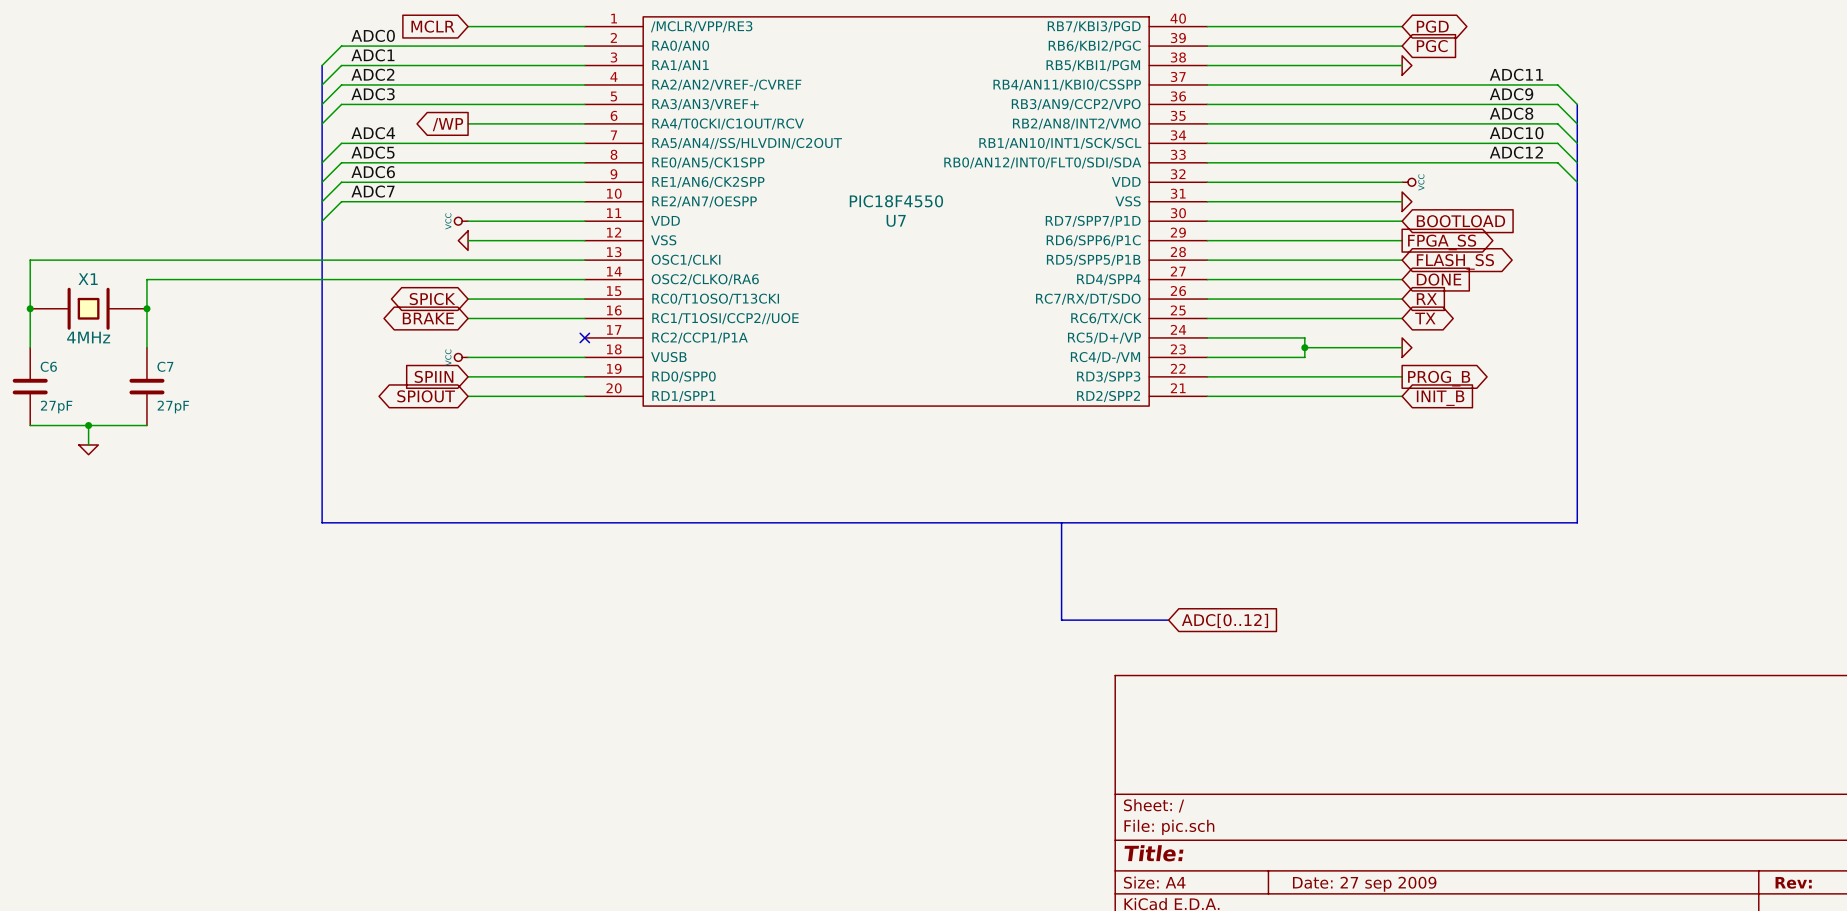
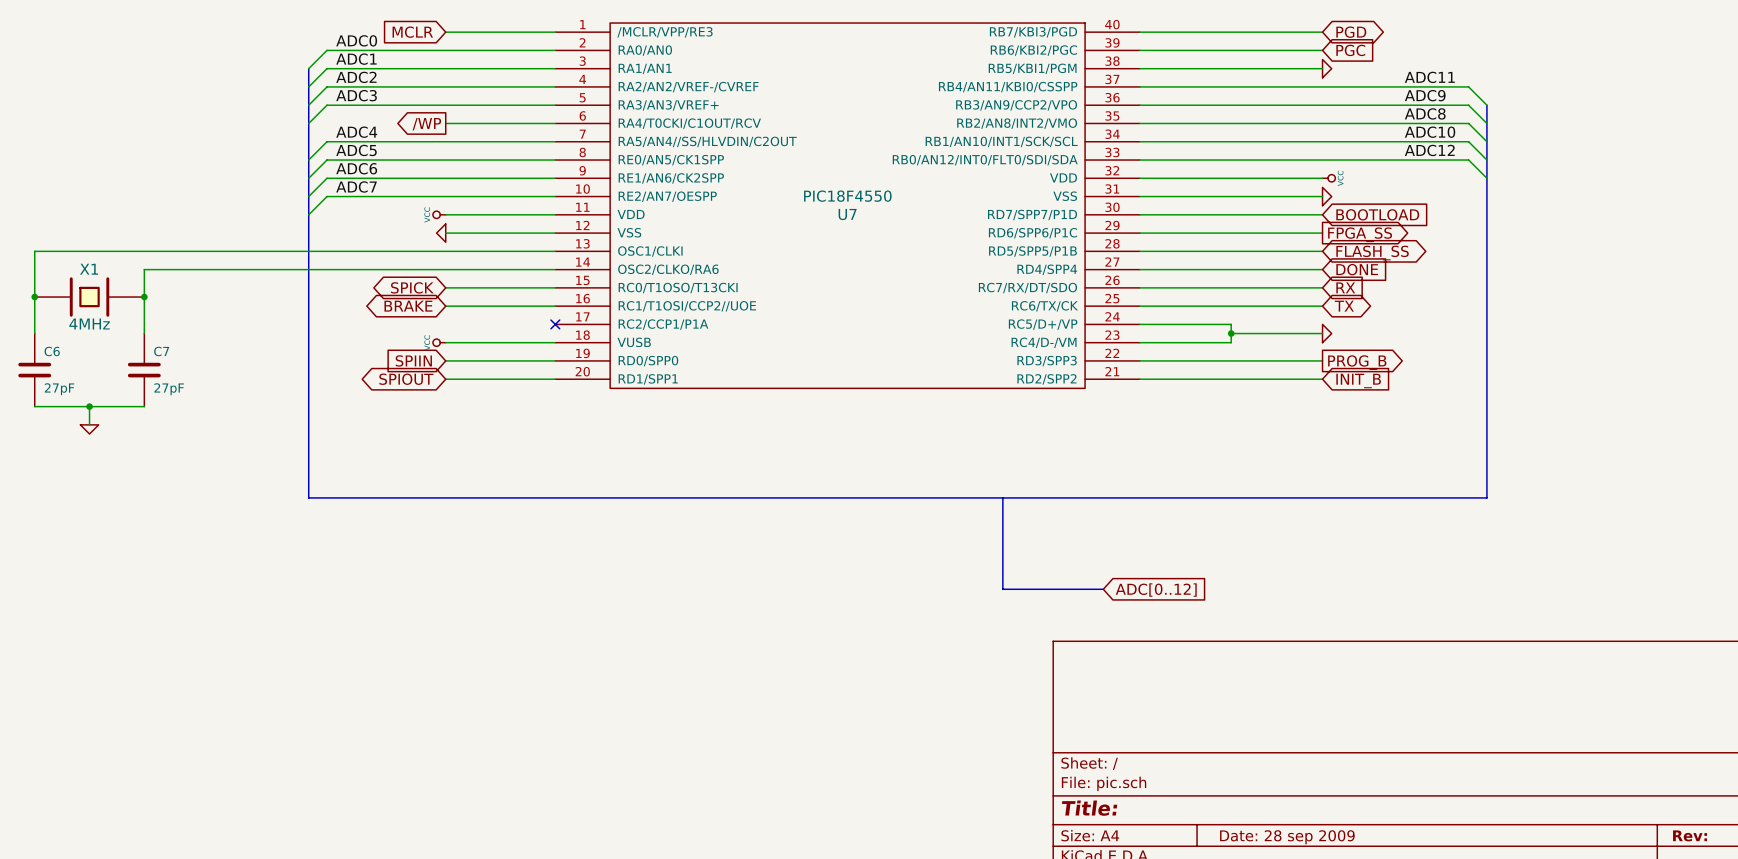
title block: Date: 27 sep 2009 (1364, 884) -> Date: 28 sep 2009 (1287, 837)

